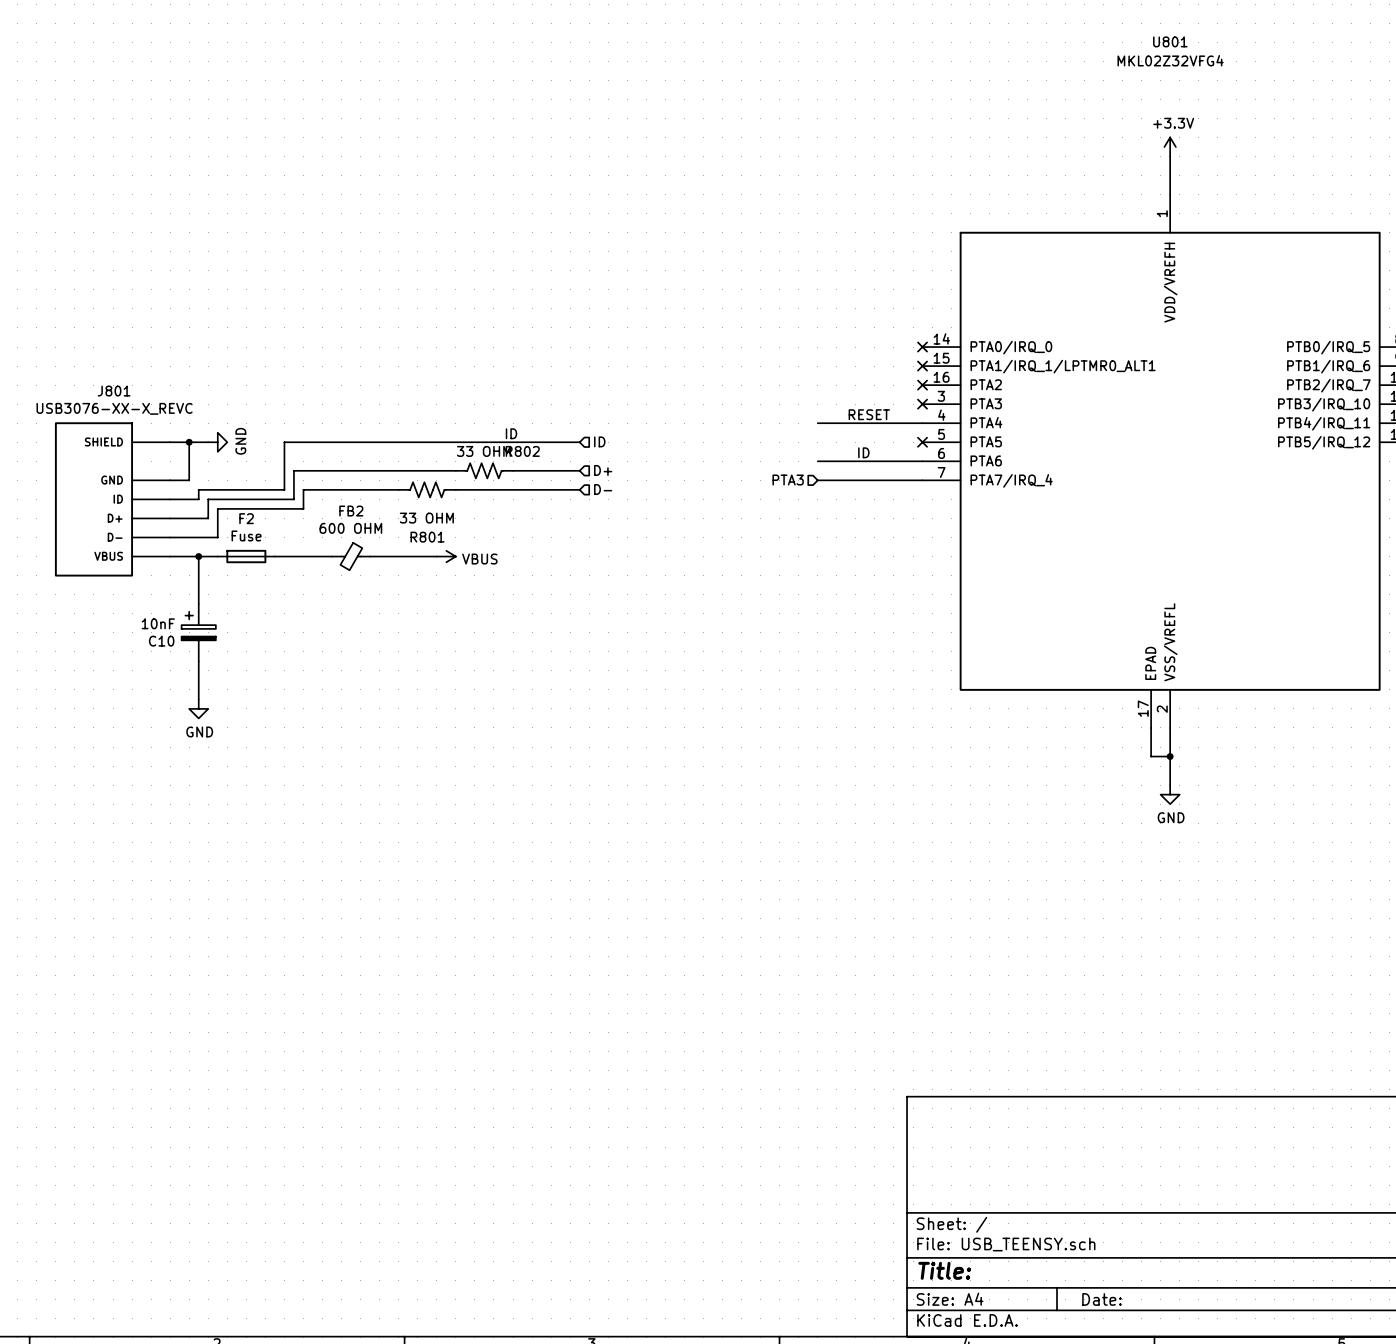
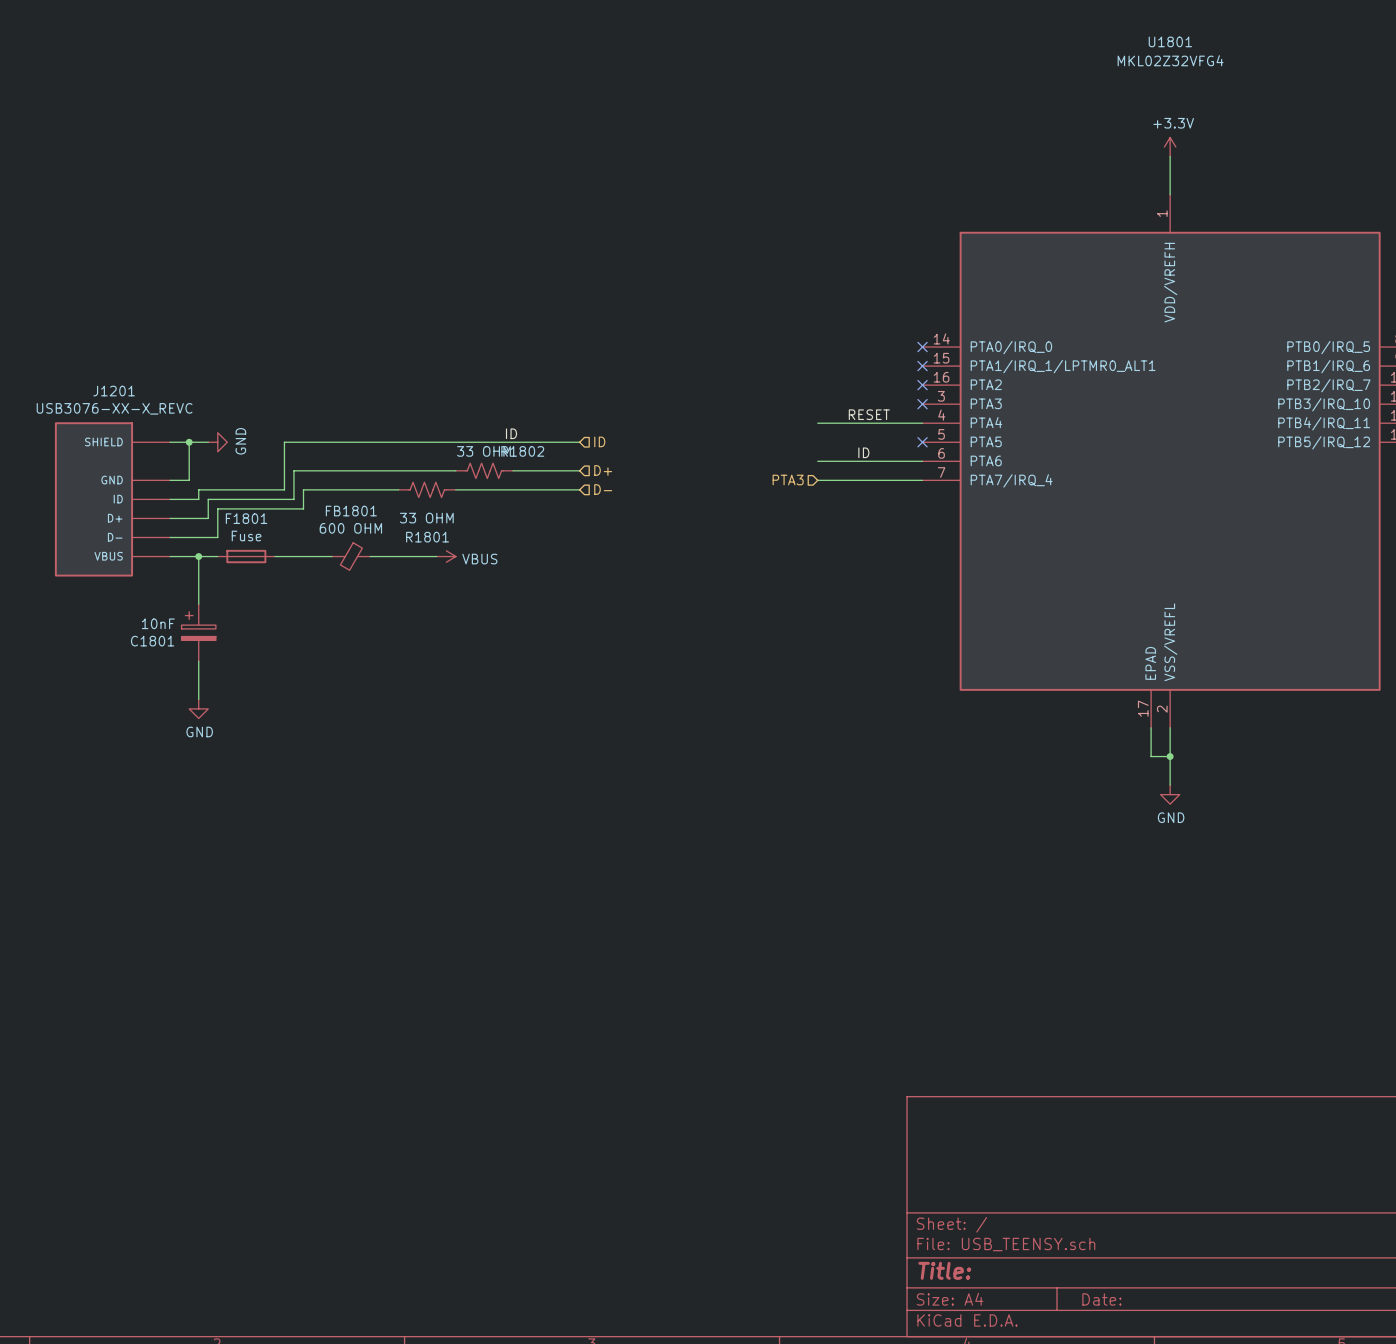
U801 name: U801 (1170, 41) -> U1801 (1170, 41)
J801 name: J801 (114, 391) -> J1201 (114, 391)
R802 name: R802 (522, 451) -> R1802 (522, 451)
FB2 name: FB2 (351, 511) -> FB1801 (351, 511)
F2 name: F2 (246, 518) -> F1801 (246, 518)
R801 name: R801 (427, 537) -> R1801 (427, 537)
C10 name: C10 (161, 641) -> C1801 (152, 641)

